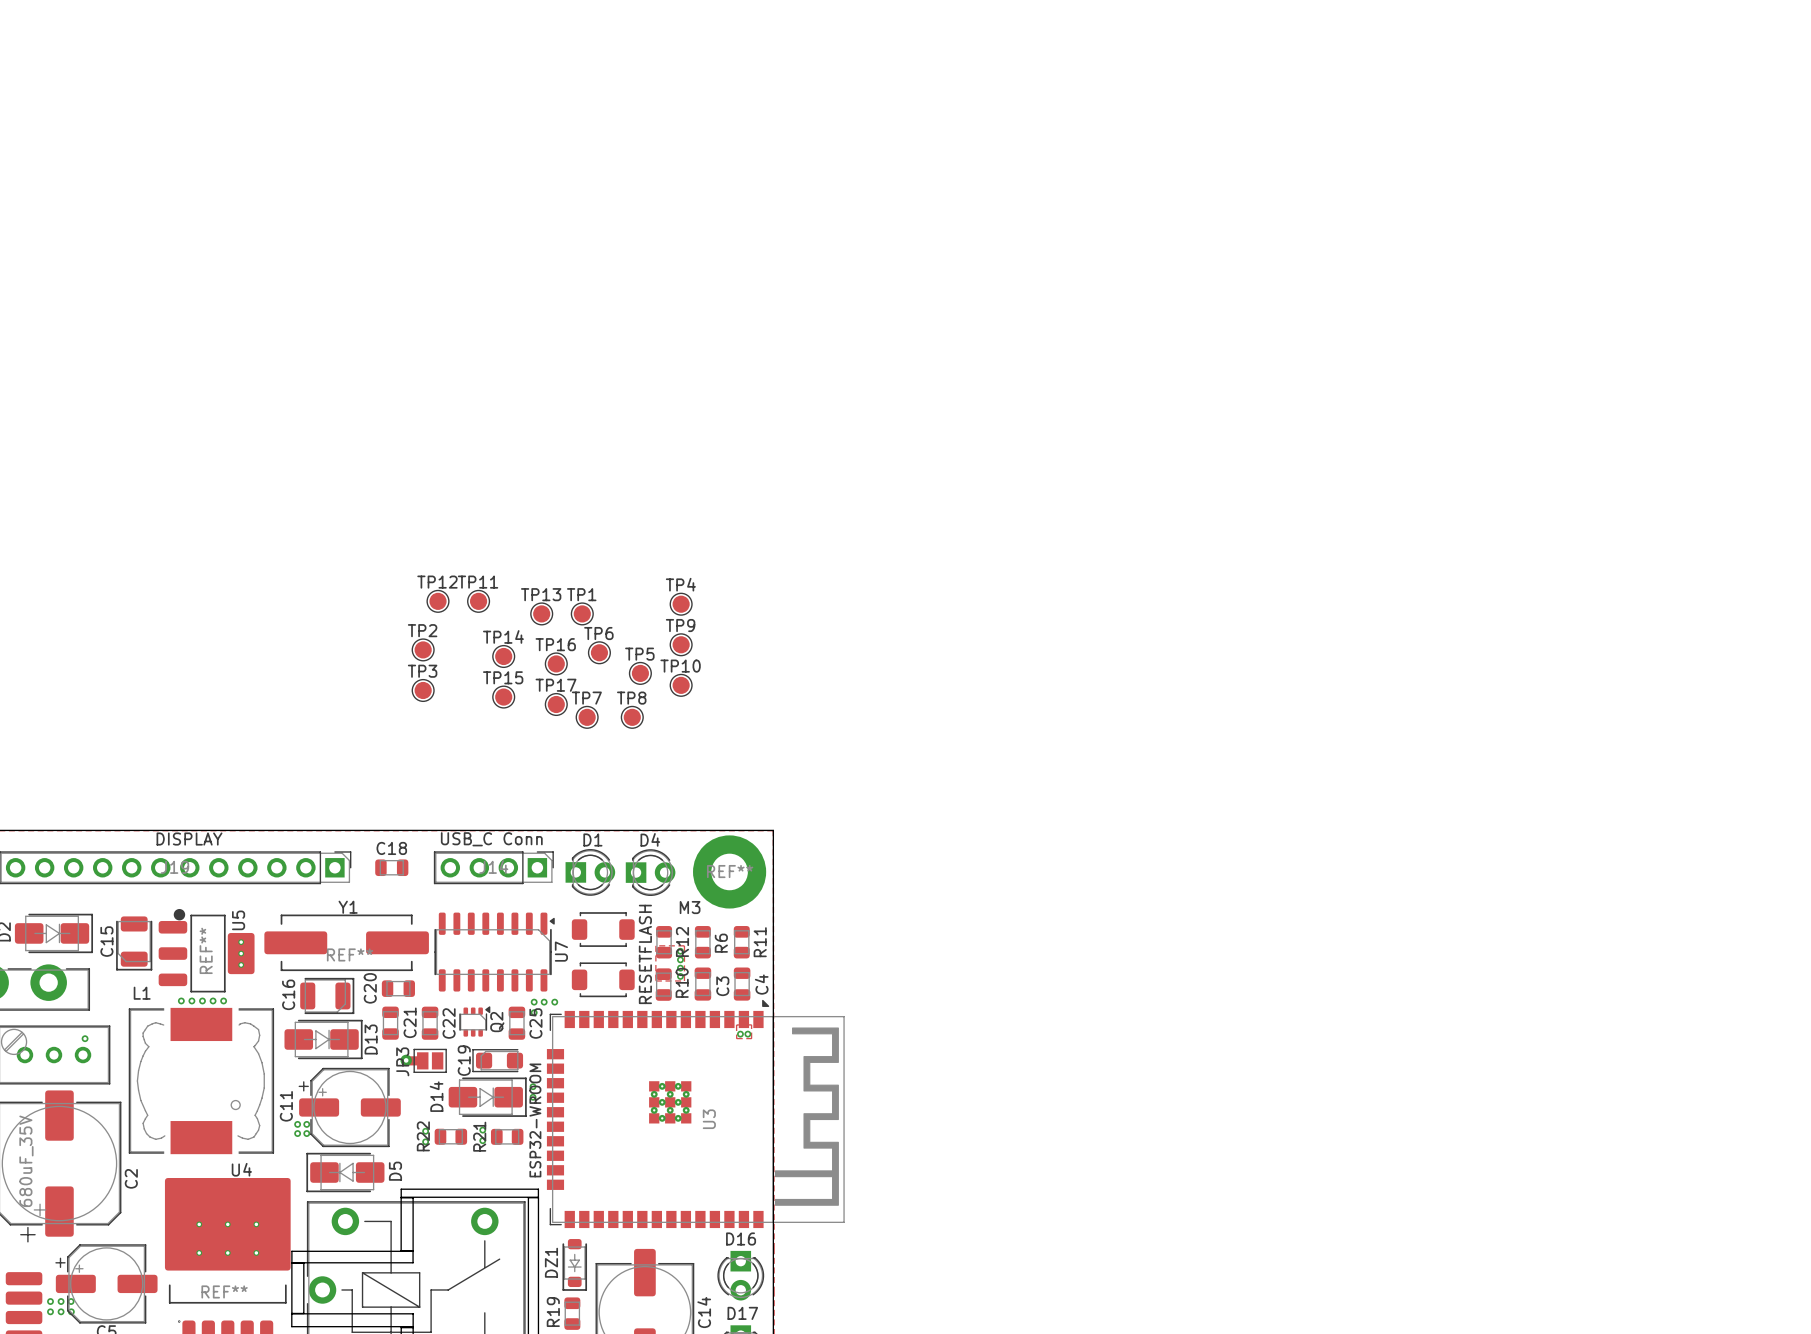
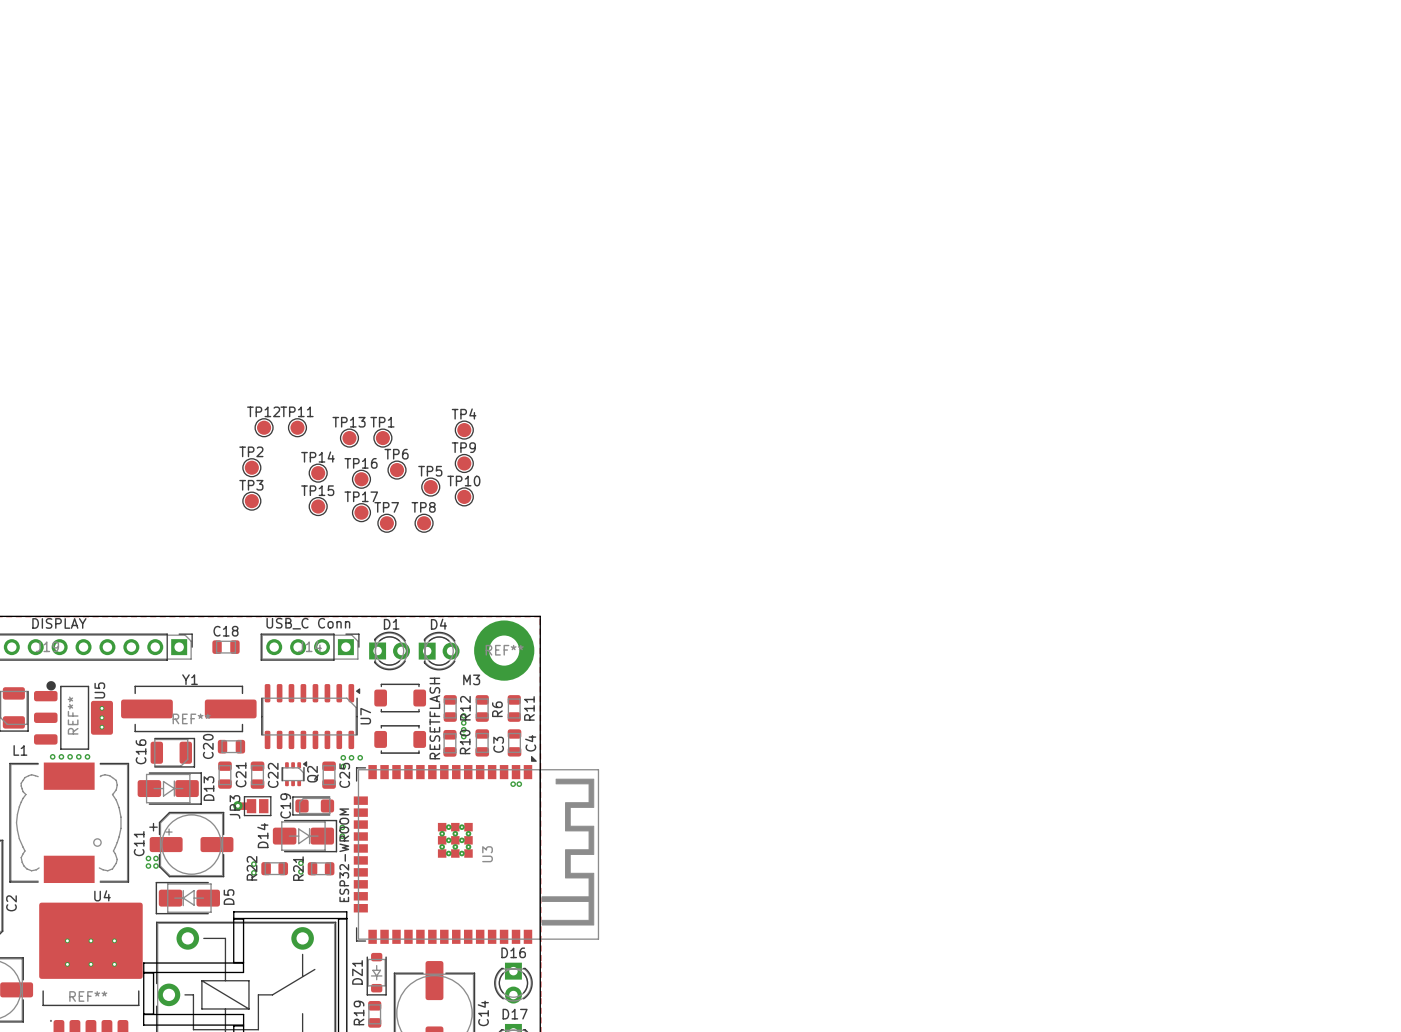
zone outline: (655, 945) (655, 980) (684, 980) (684, 945) (655, 945) -> none
zone outline: (751, 1024) (751, 1038) (736, 1038) (736, 1024) (751, 1024) -> none

